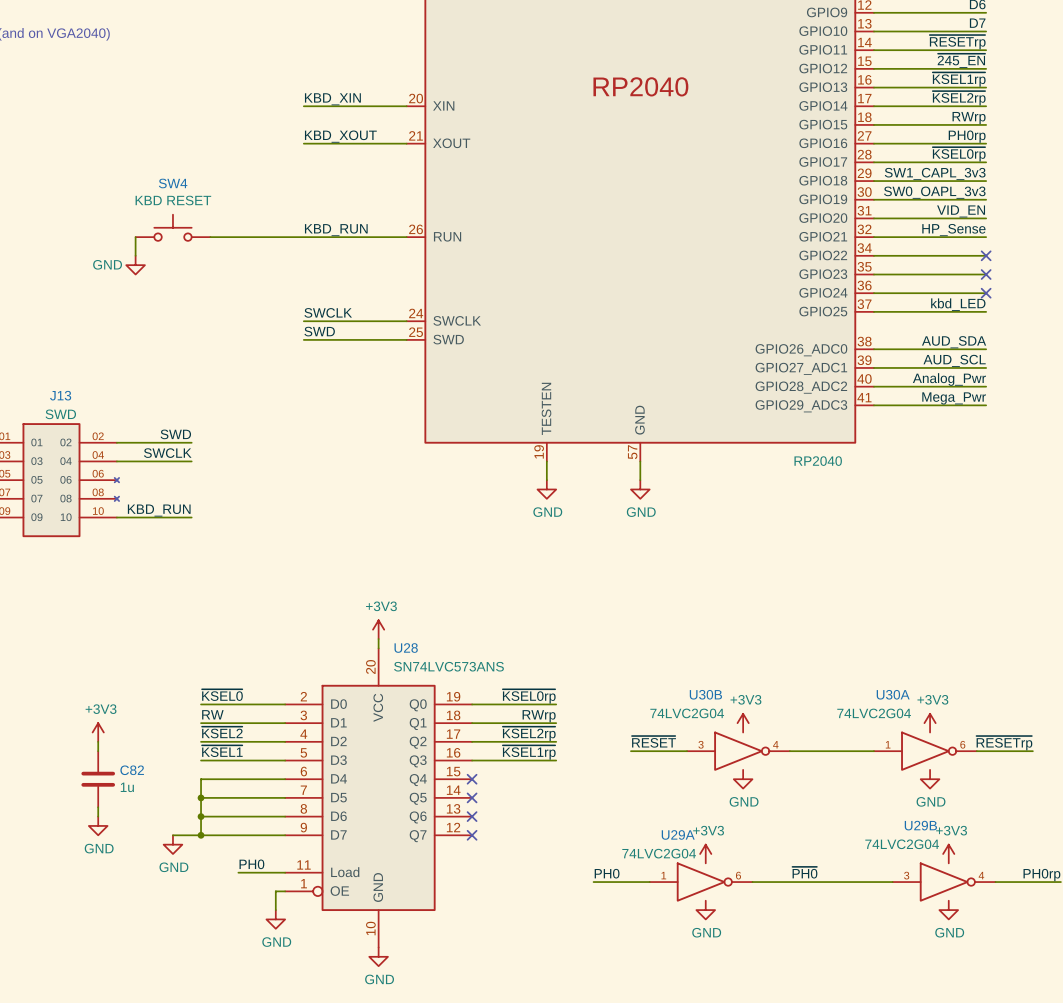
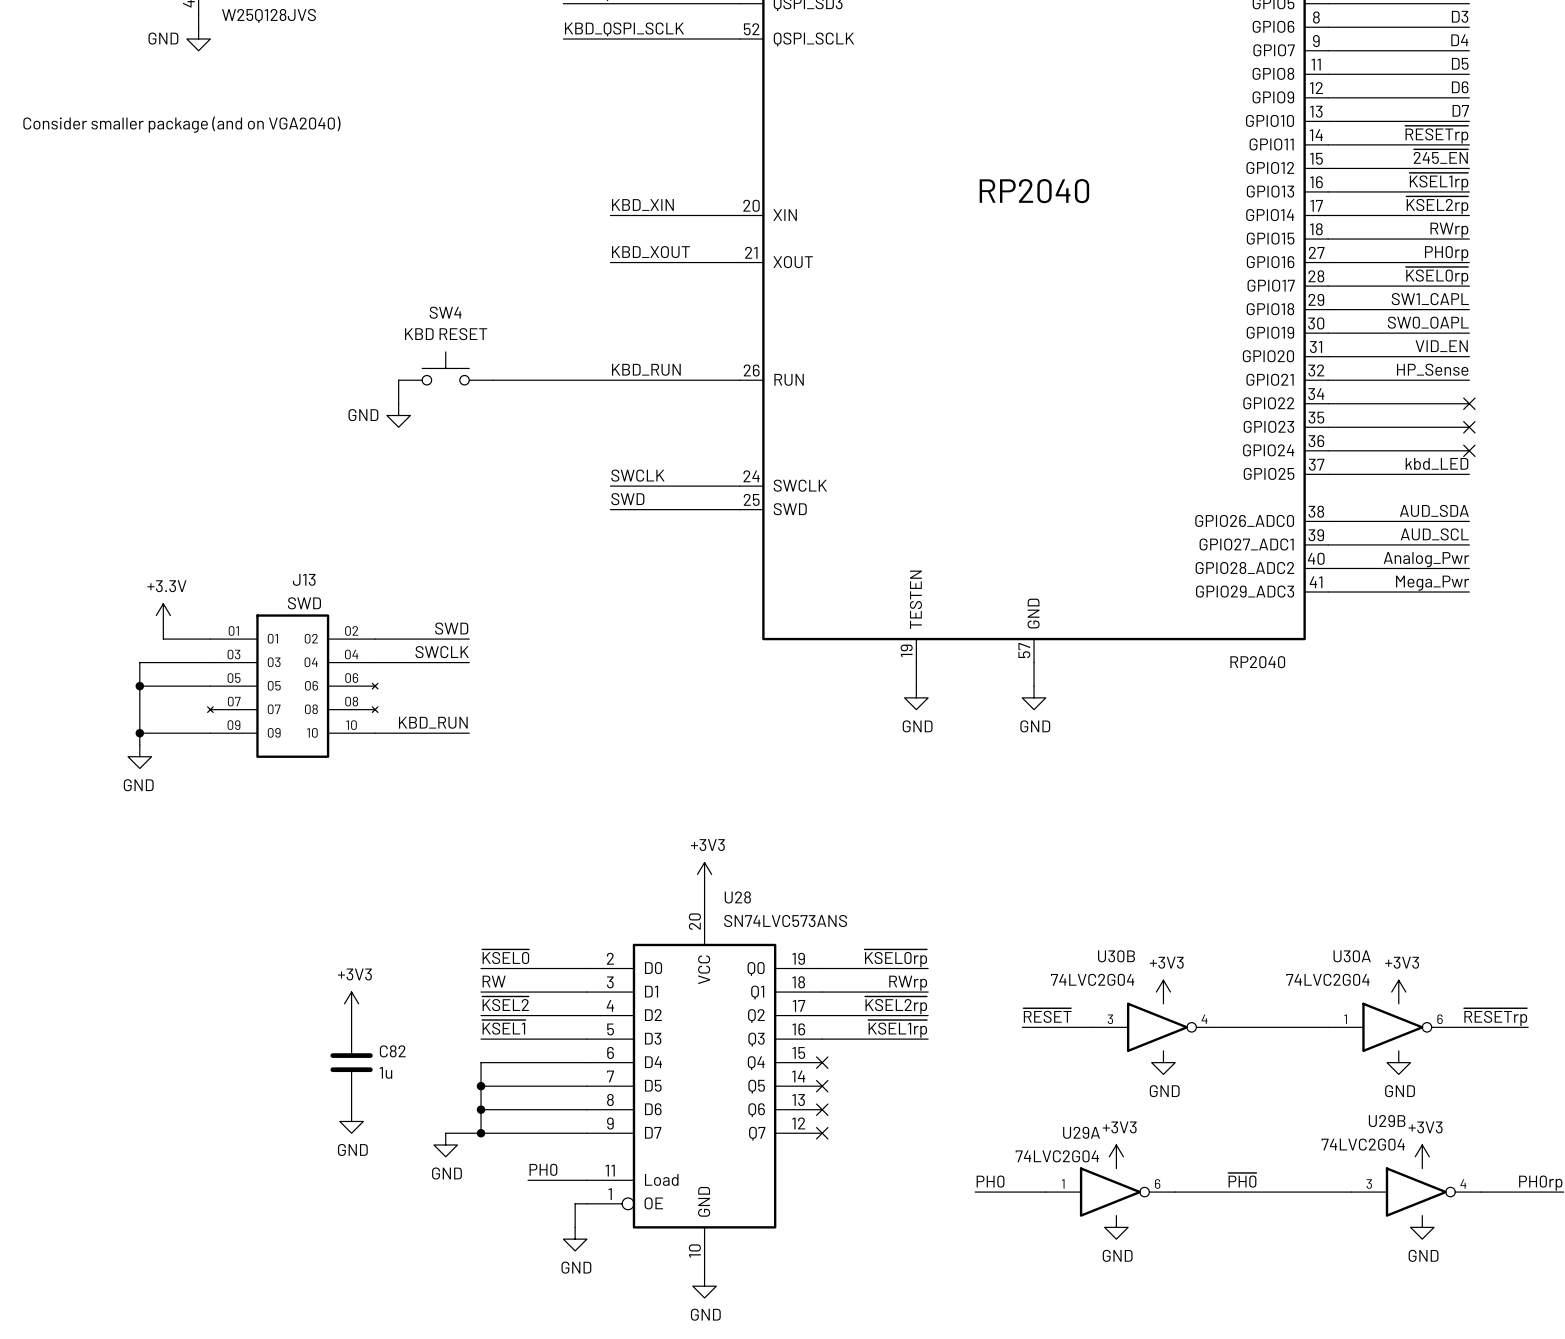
label: SW1_CAPL_3v3 (935, 173) -> SW1_CAPL (1430, 299)
label: SW0_OAPL_3v3 (934, 192) -> SW0_OAPL (1428, 322)

